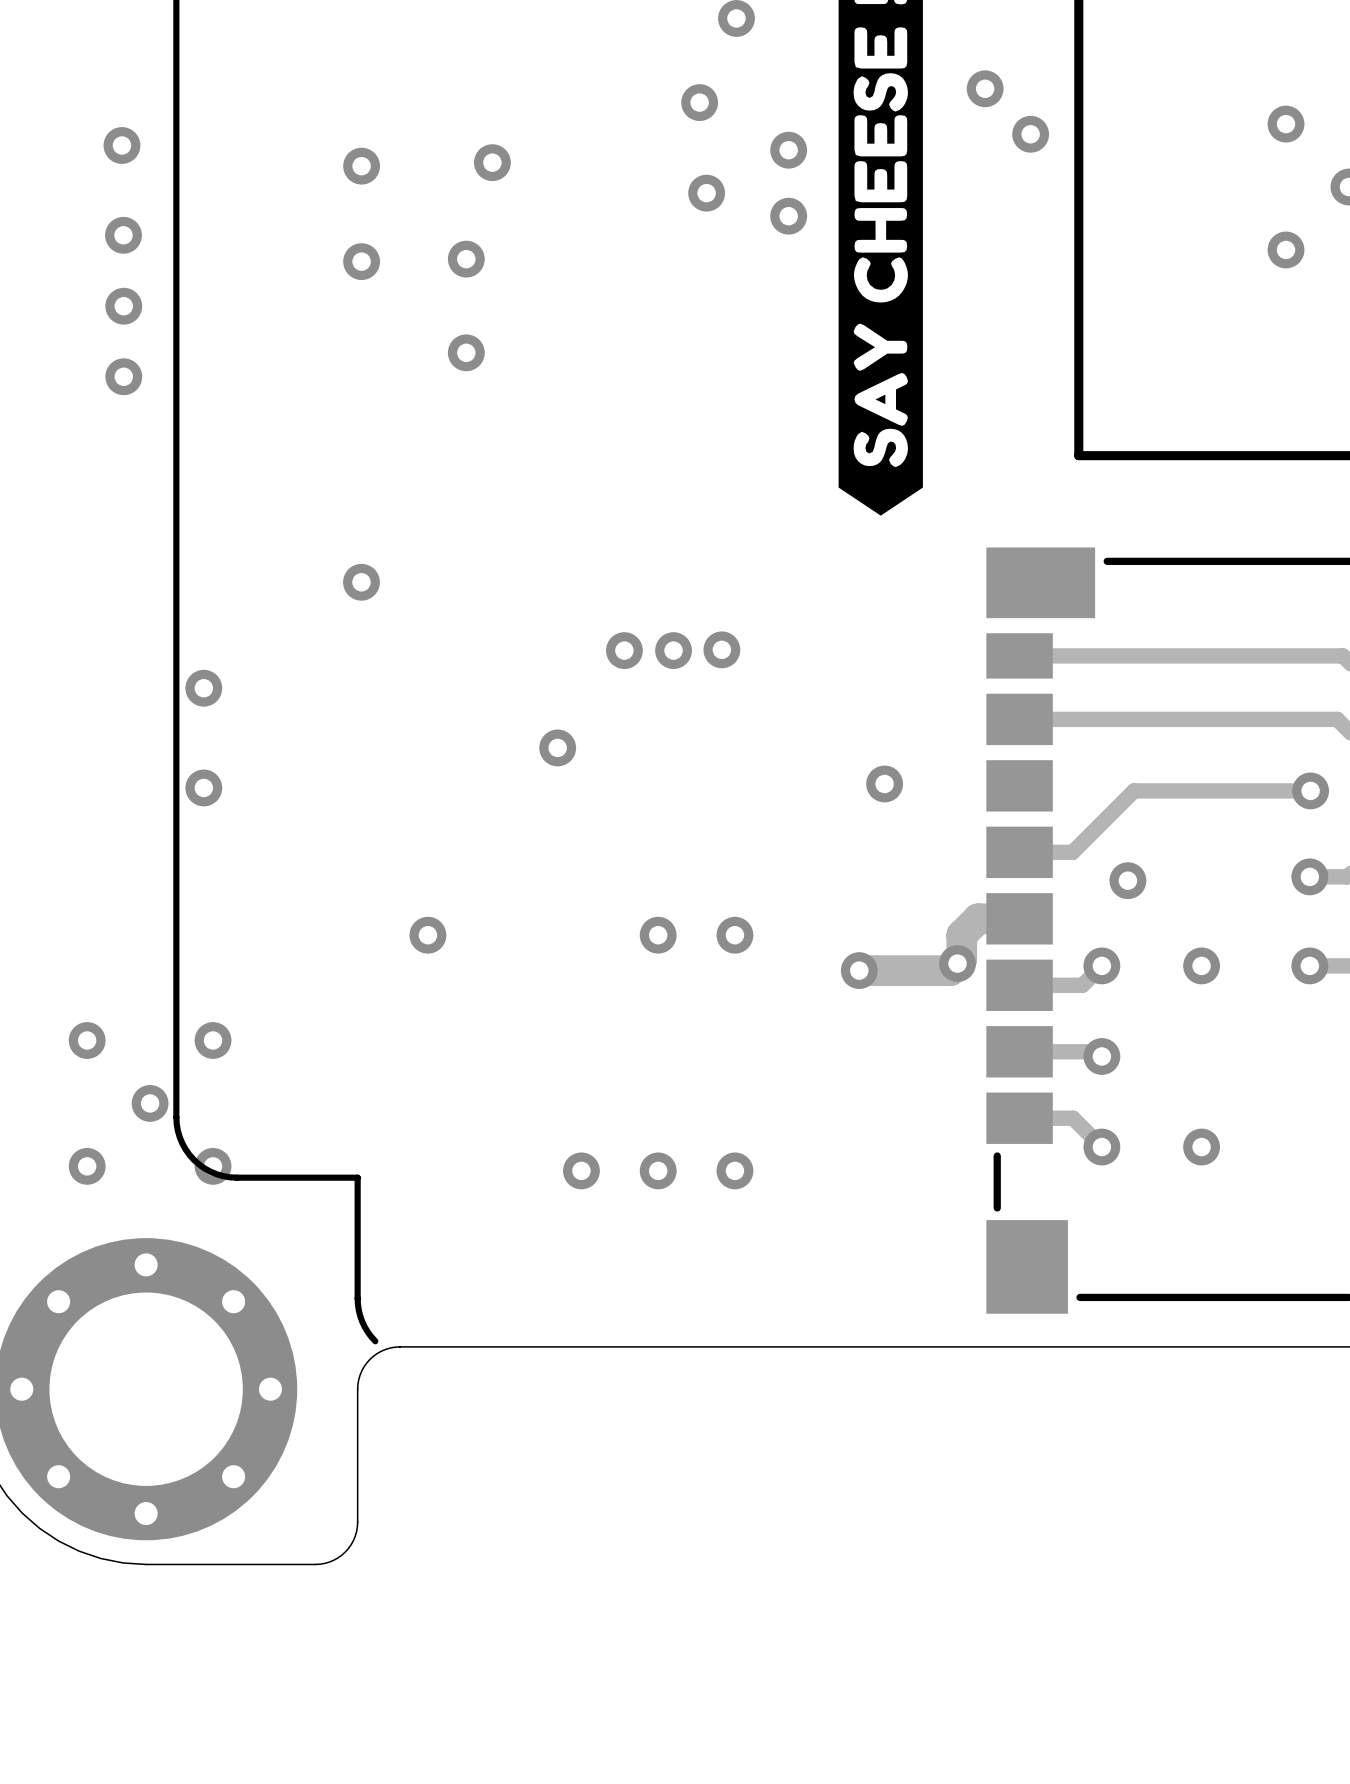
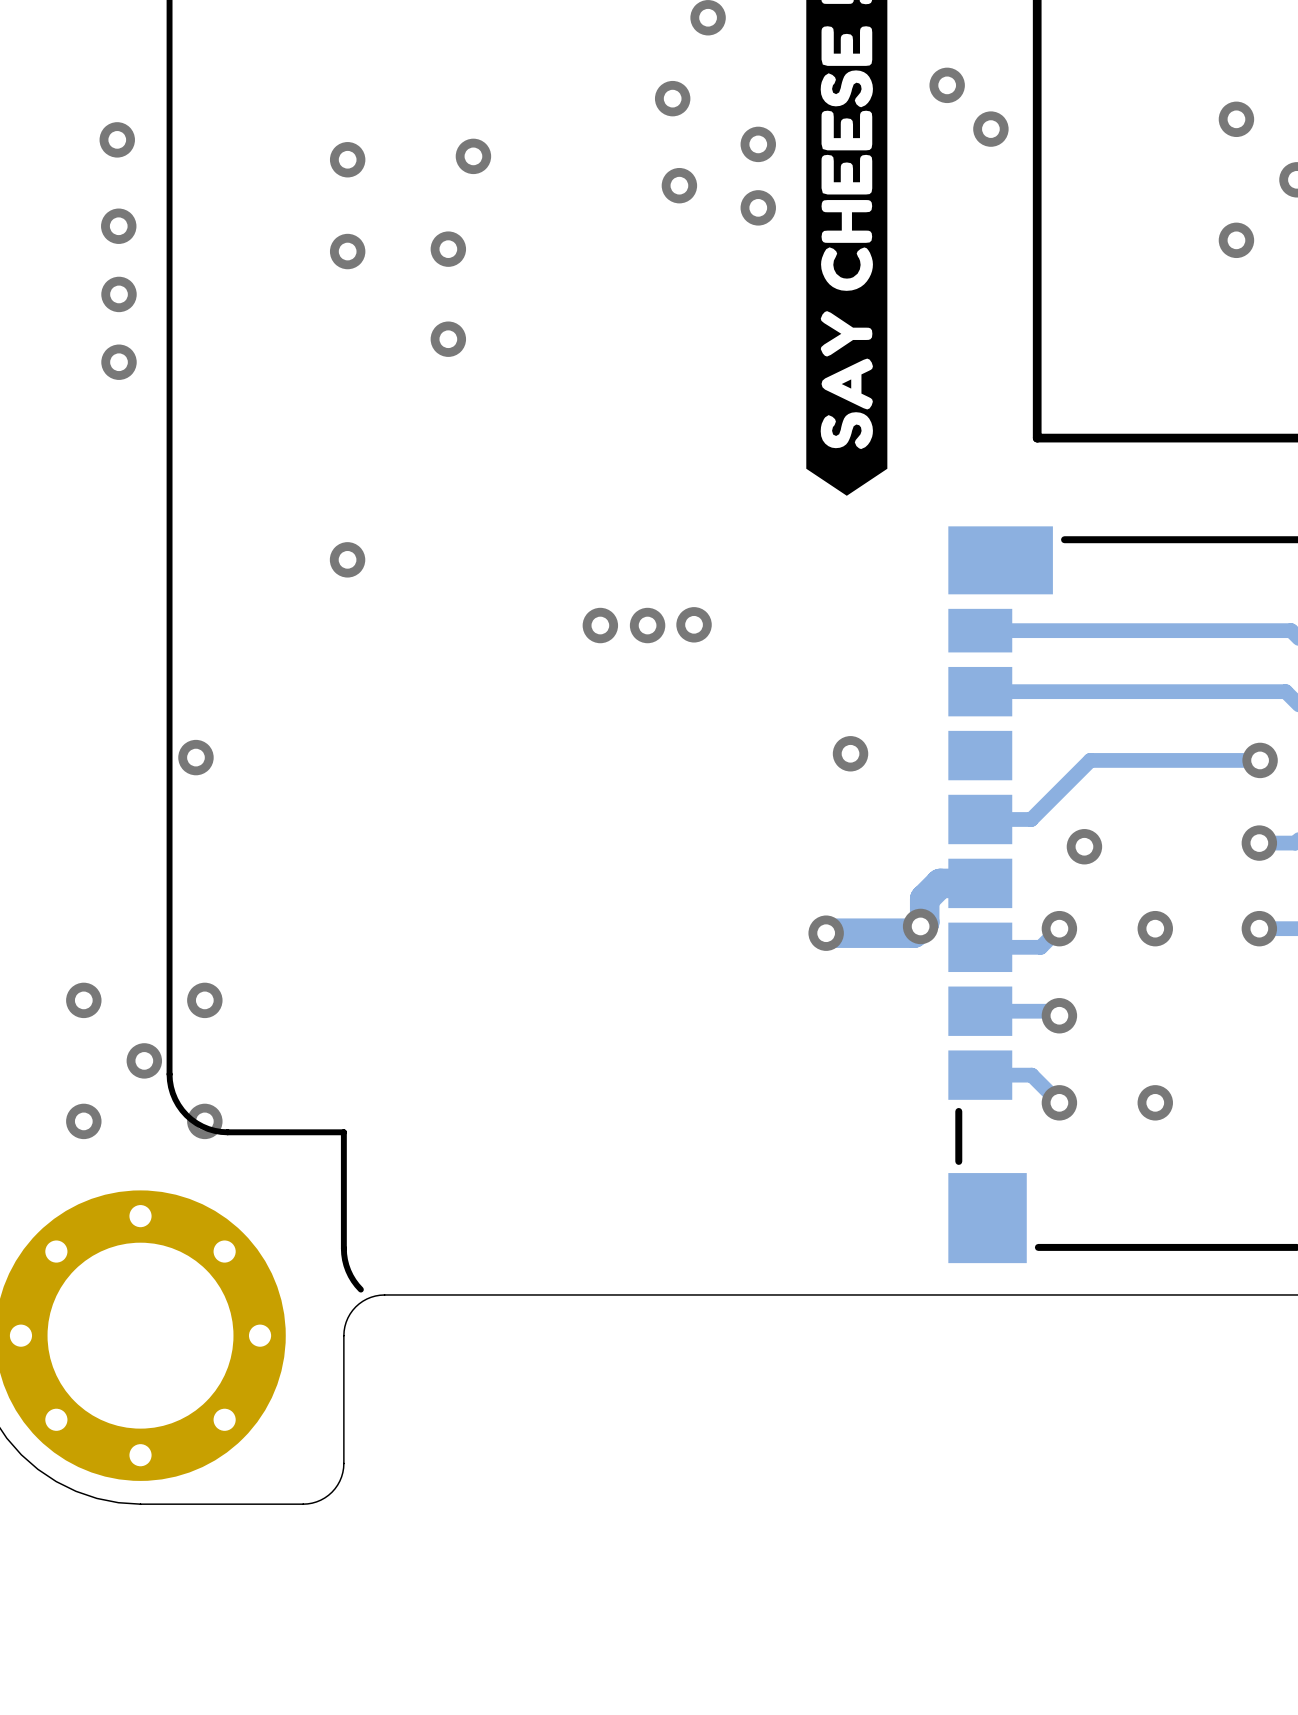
via: (203, 688) -> none
via: (557, 747) -> none
via: (427, 935) -> none
via: (658, 935) -> none
via: (734, 935) -> none
via: (581, 1170) -> none
via: (658, 1170) -> none
via: (734, 1170) -> none

